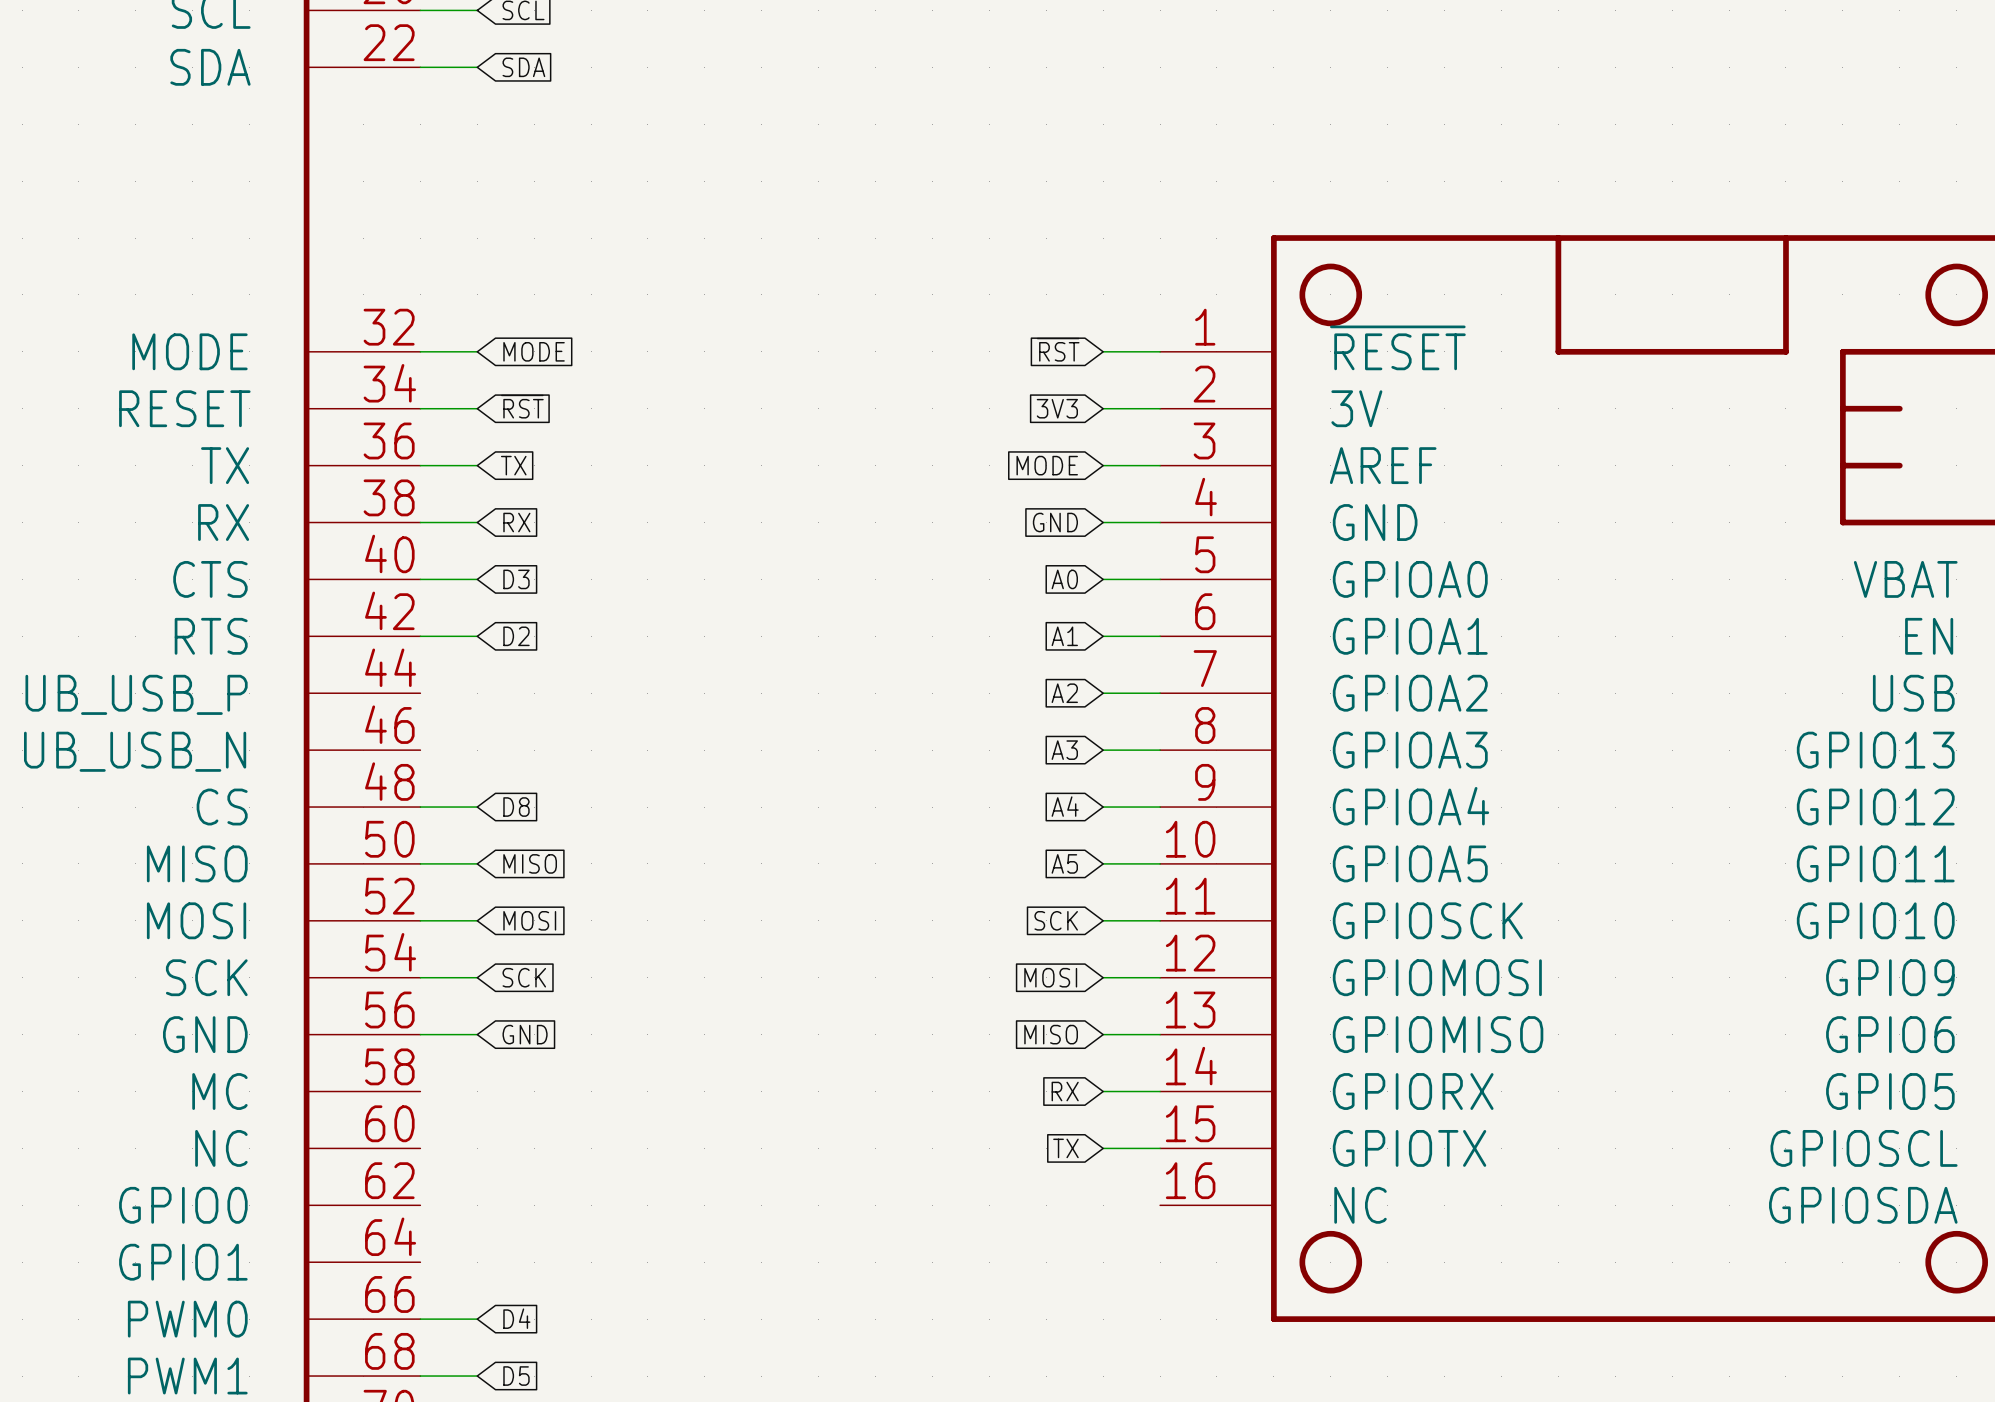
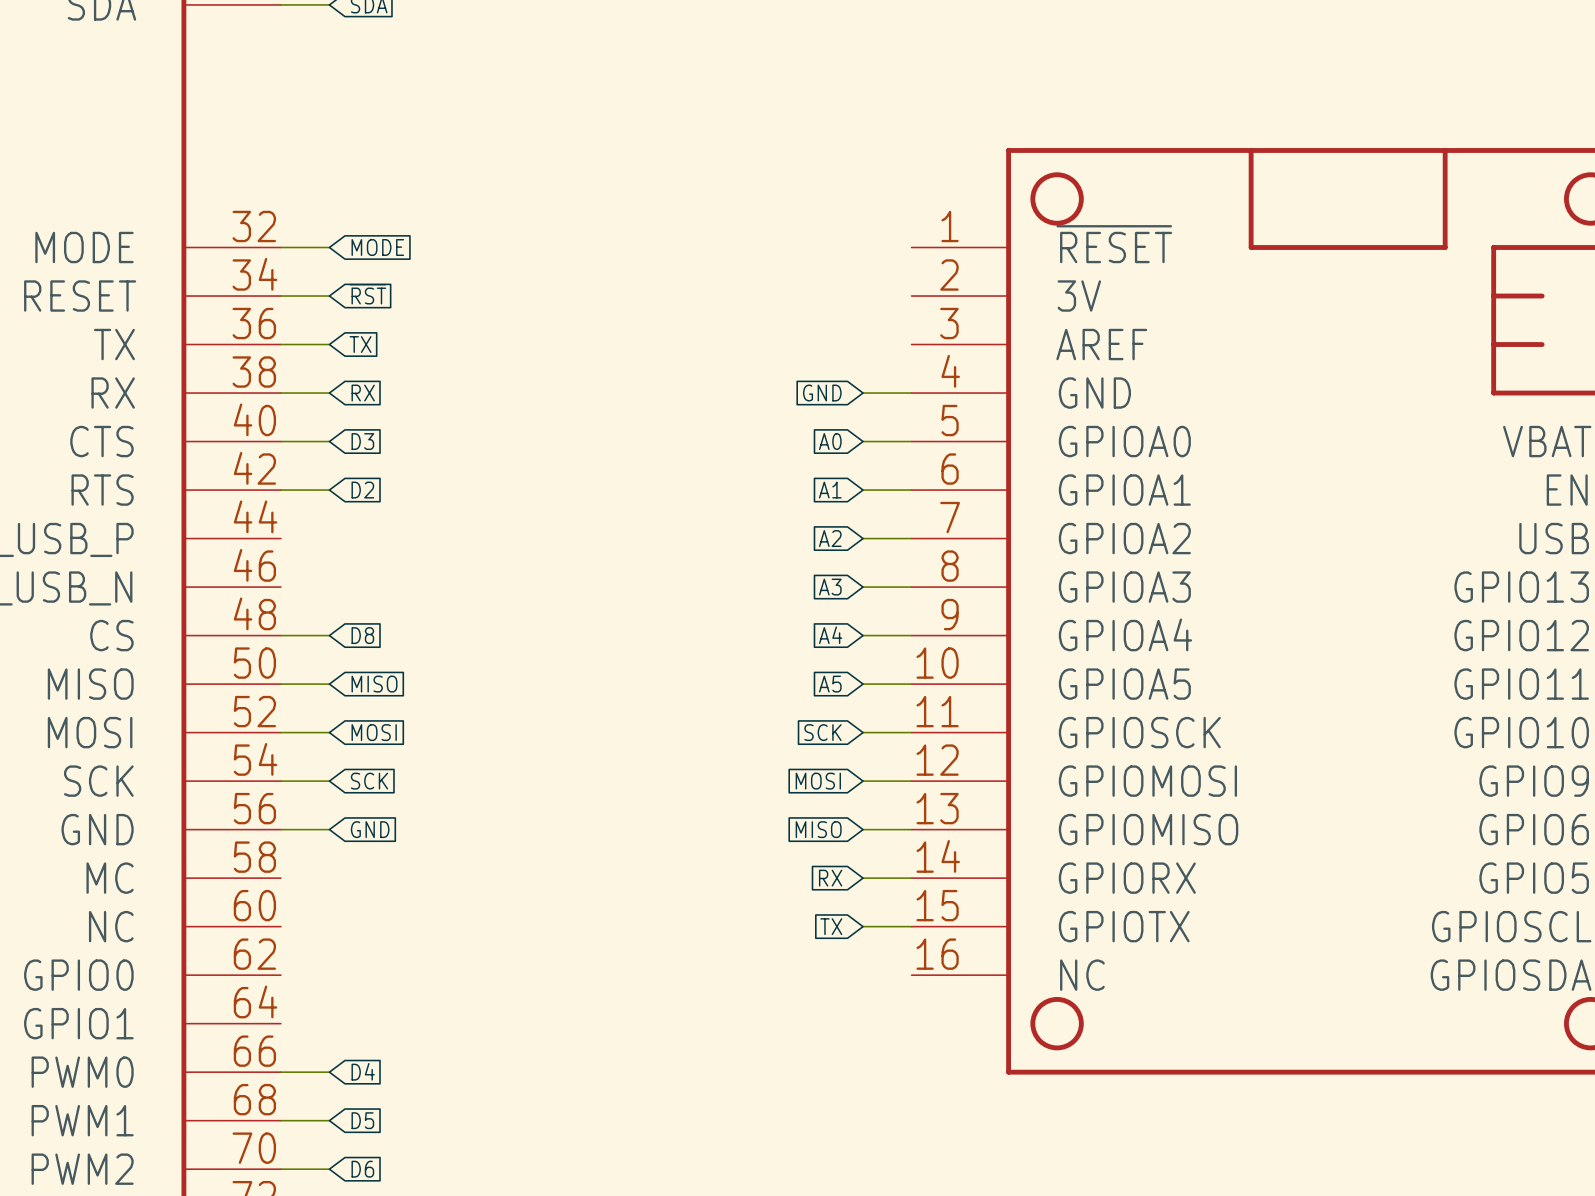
global label: ~{RST} (1058, 349) -> none
wire: (1103, 351) (1160, 351) -> none
global label: 3V3 (1057, 408) -> none
wire: (1103, 408) (1160, 408) -> none
global label: MODE (1047, 465) -> none
wire: (1103, 465) (1160, 465) -> none

